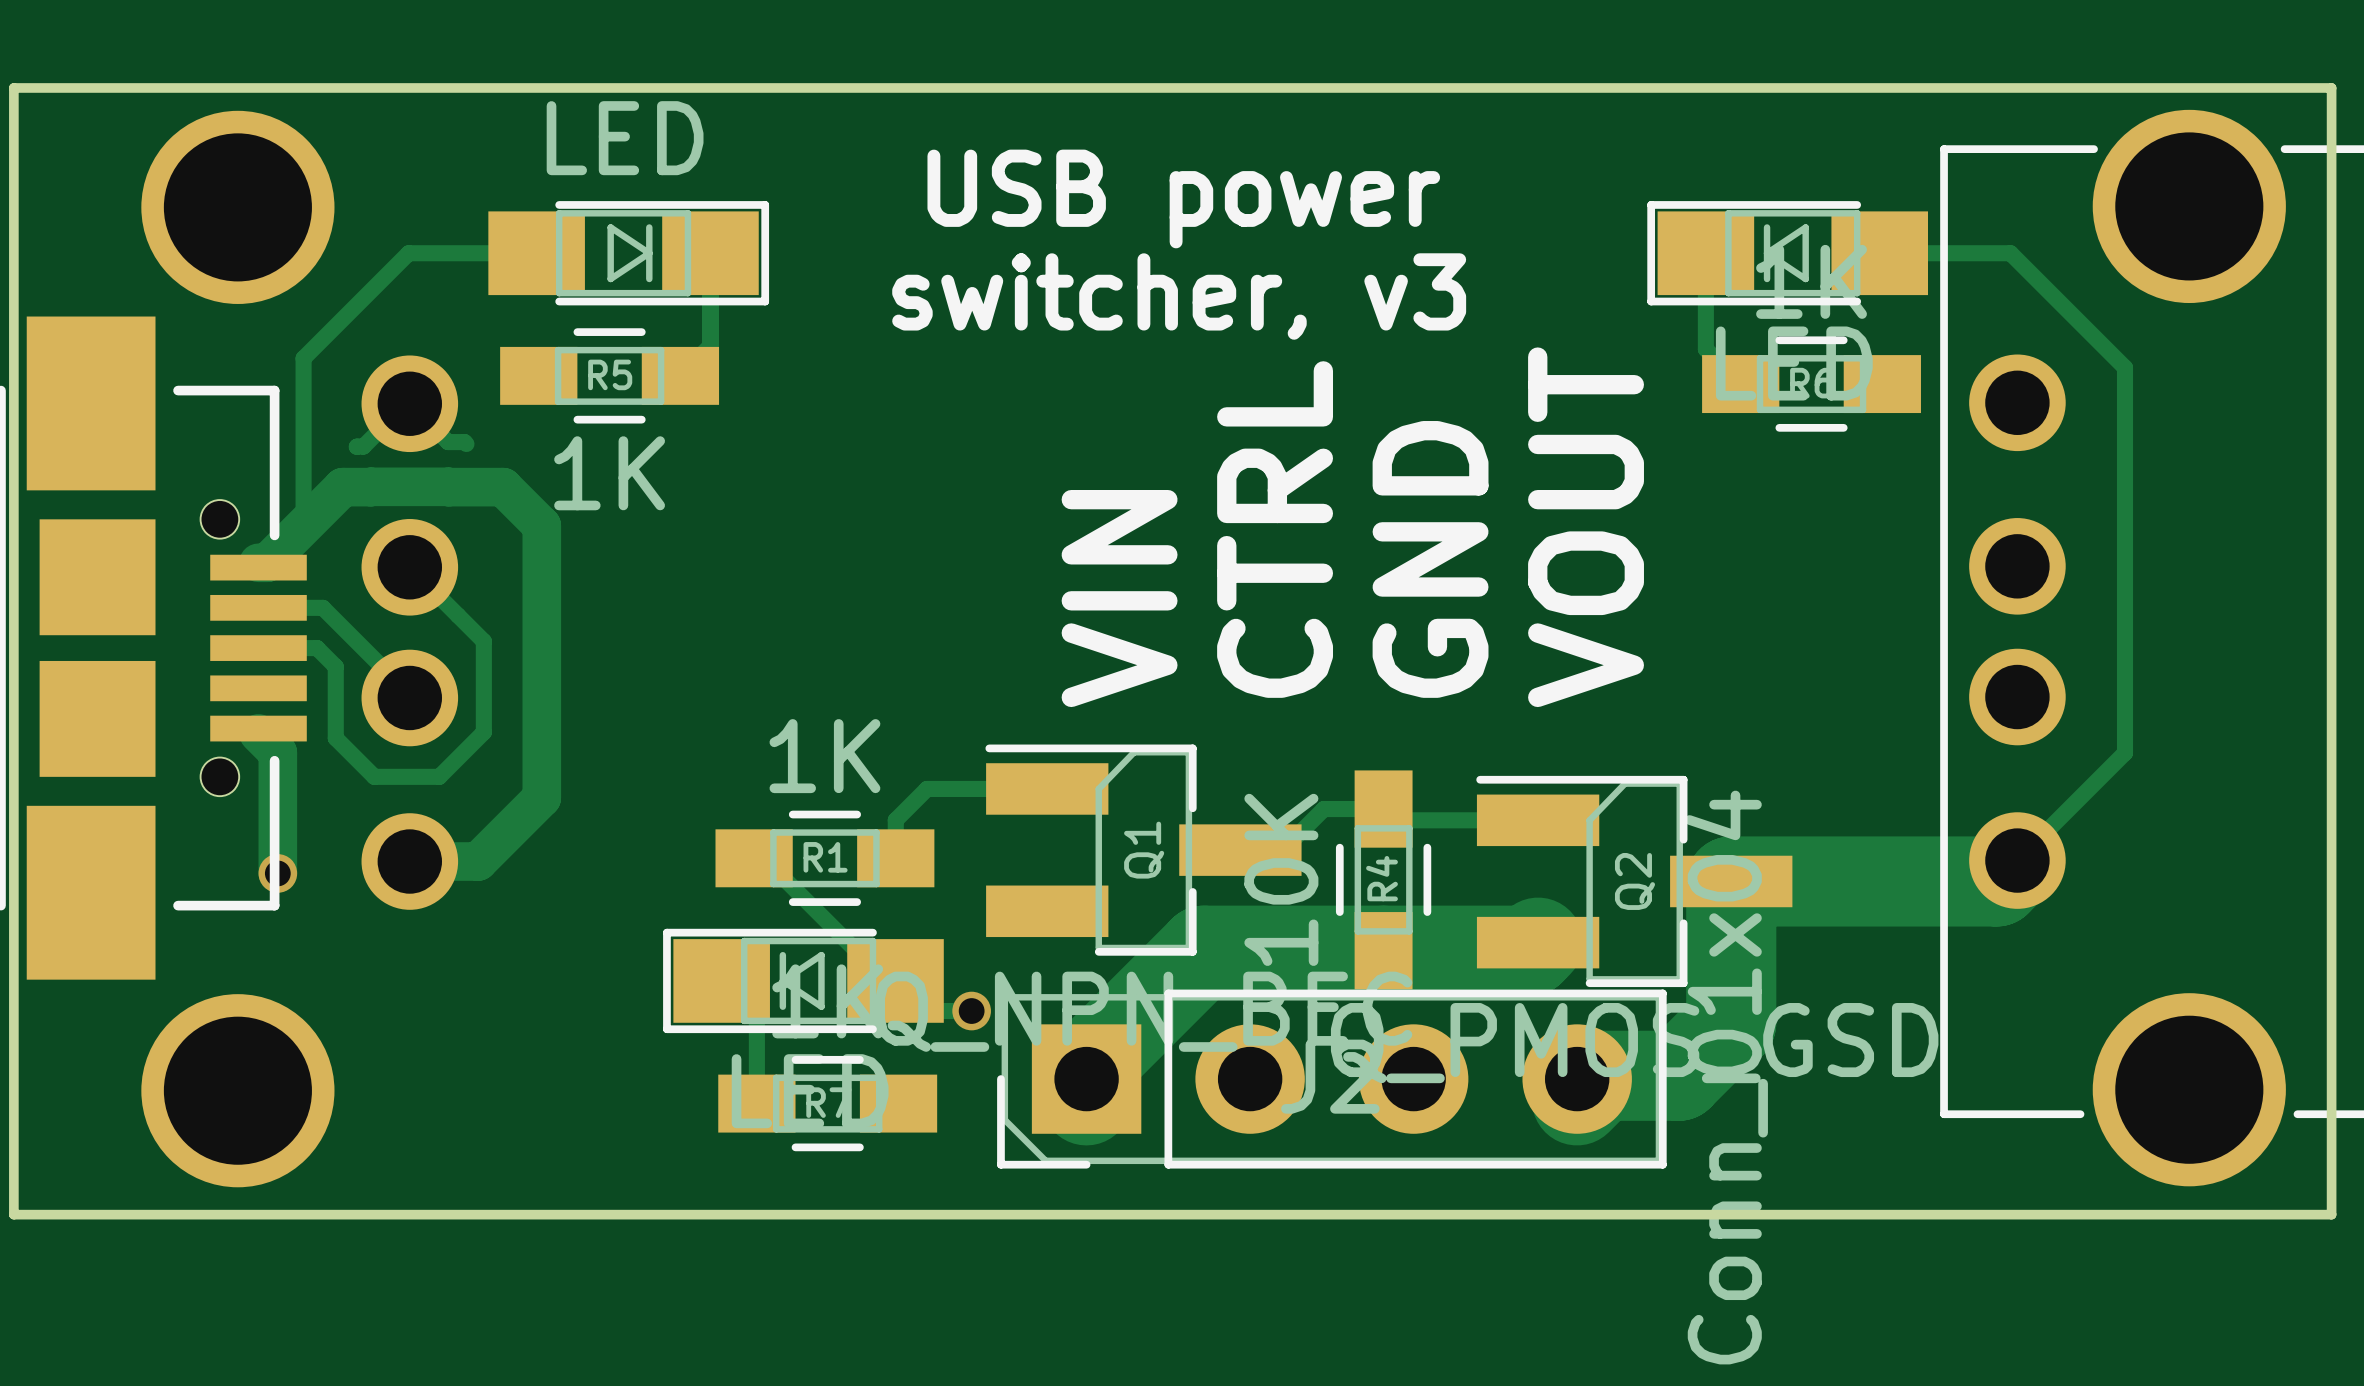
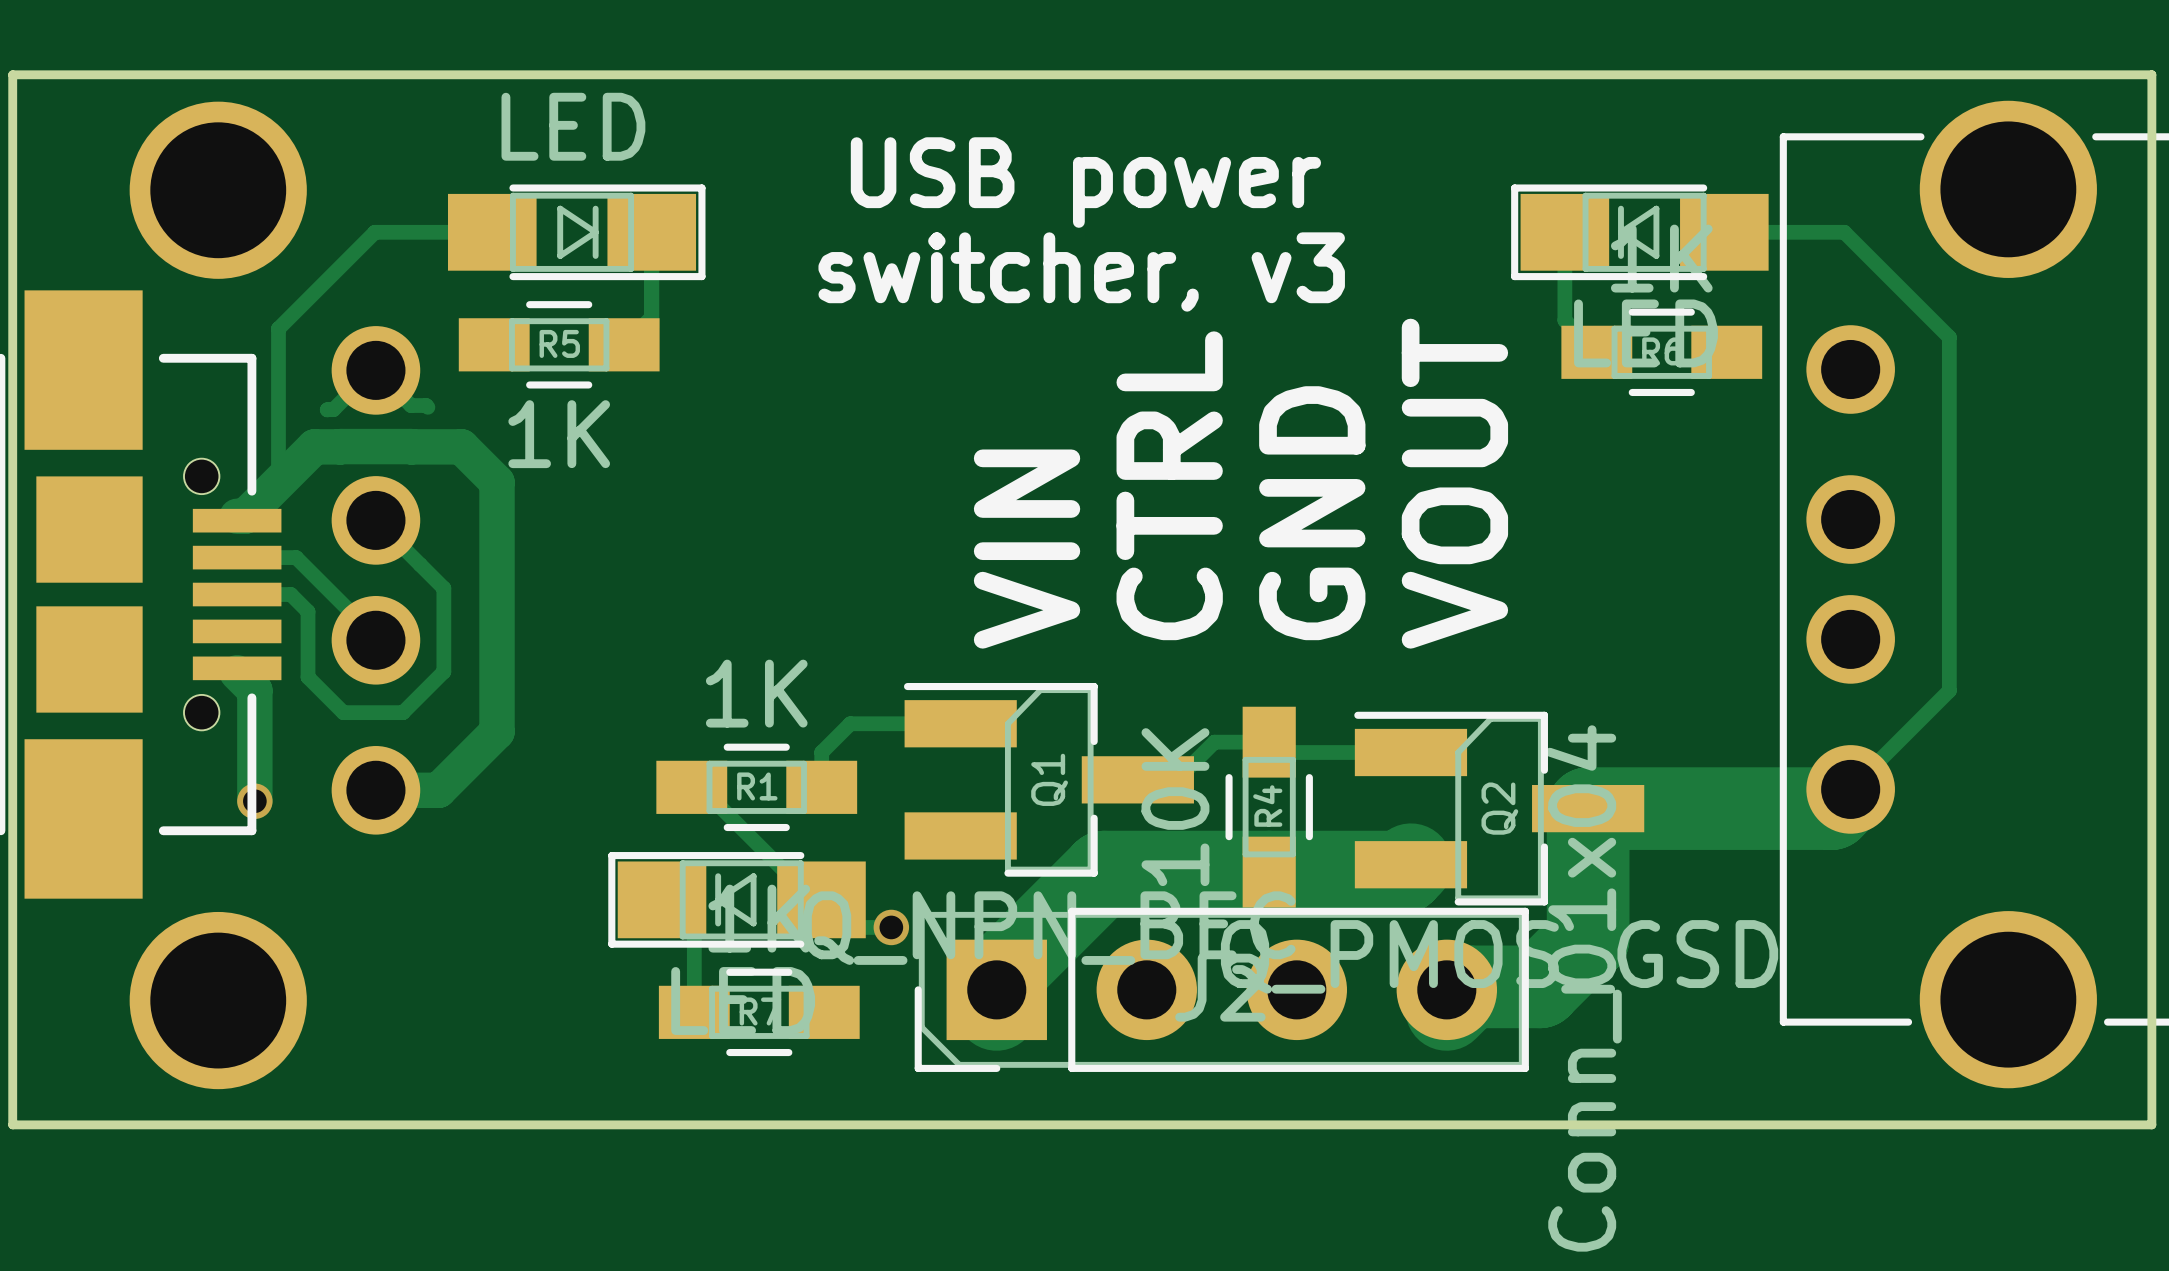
board edge: (13, 87) (2331, 87) (2331, 1214) (13, 1214) -> (12, 80) (12, 74) (2151, 74) (2151, 1124) (12, 1124) (12, 1114)

